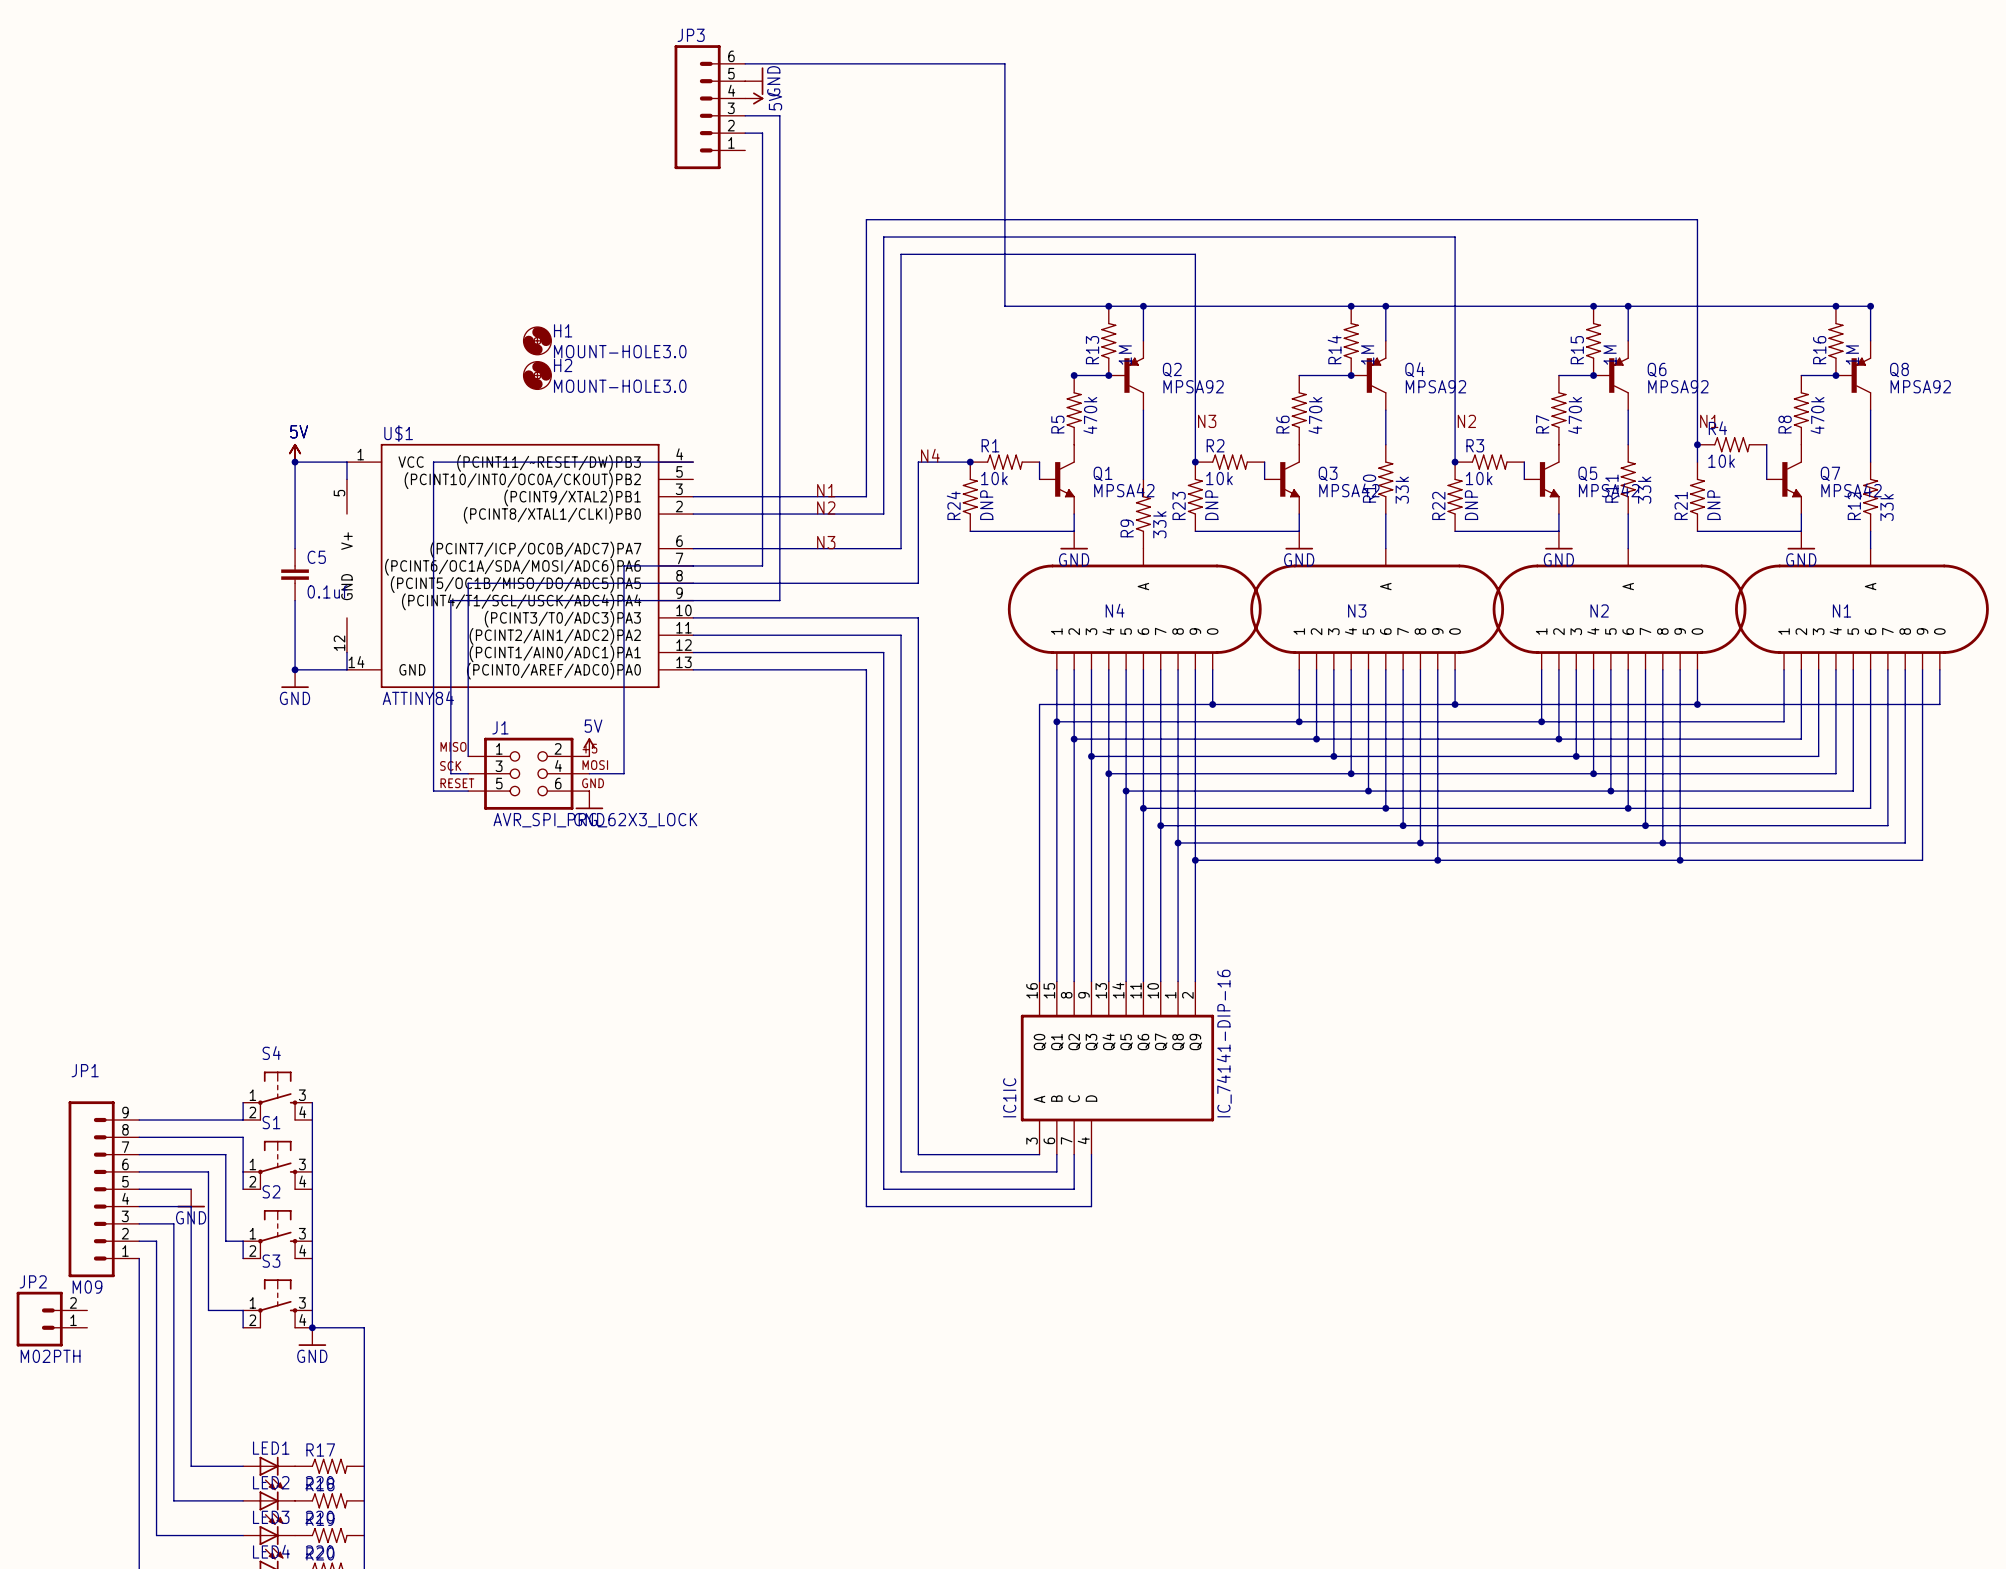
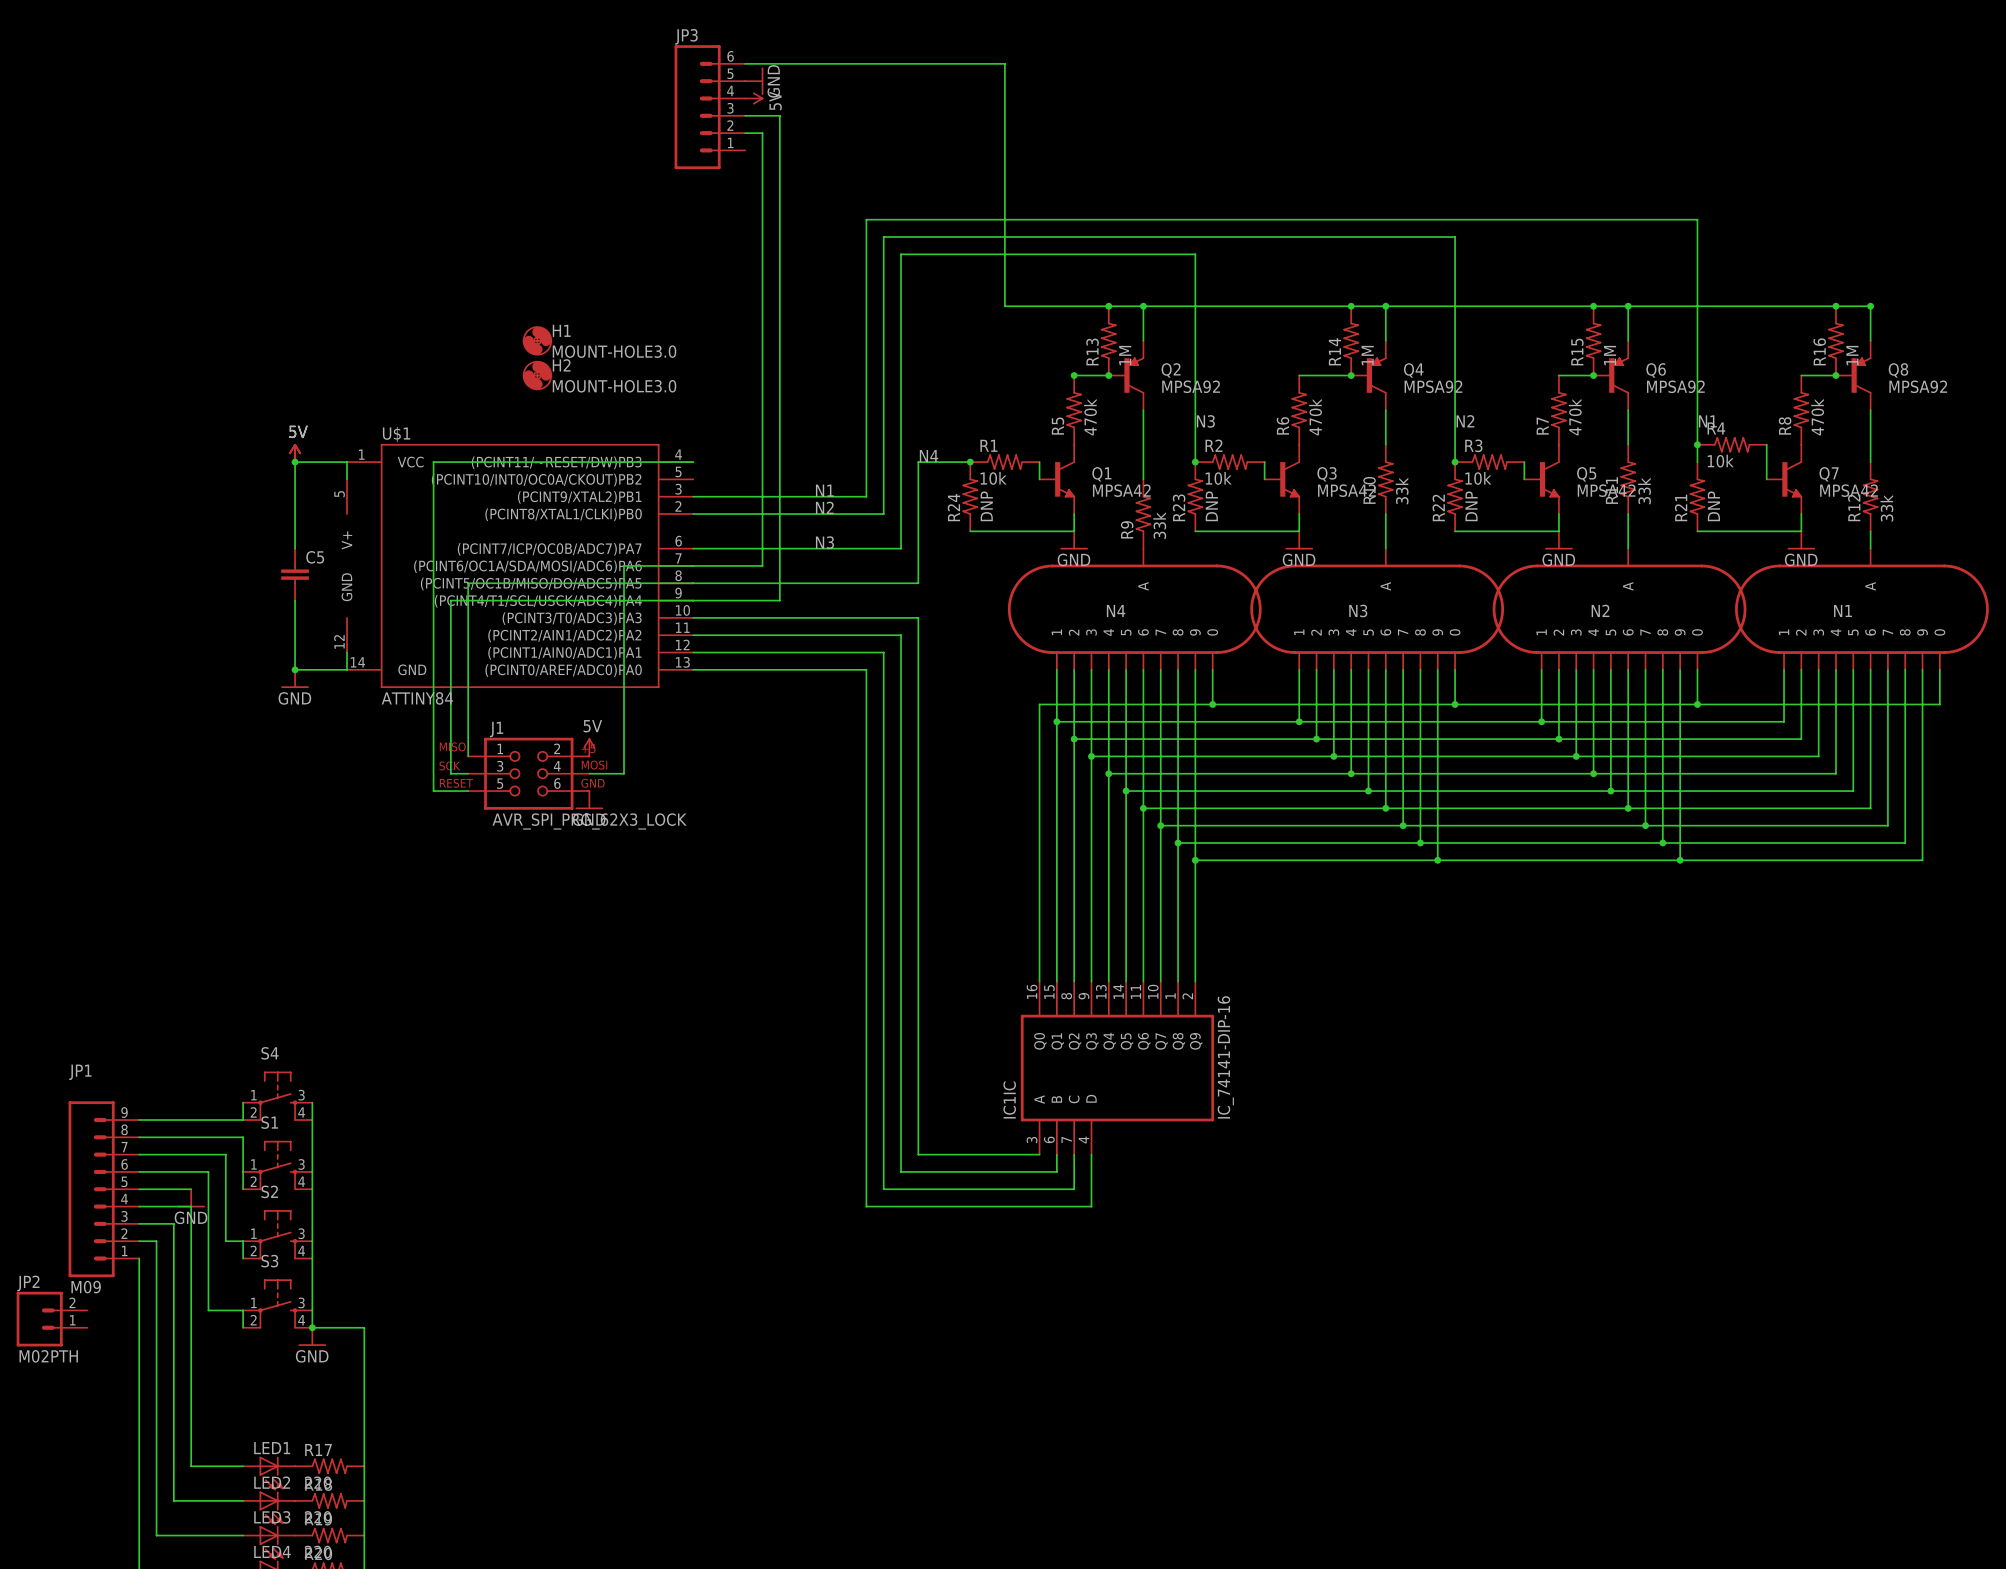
C5 value: 0.1uf (327, 591) -> none

